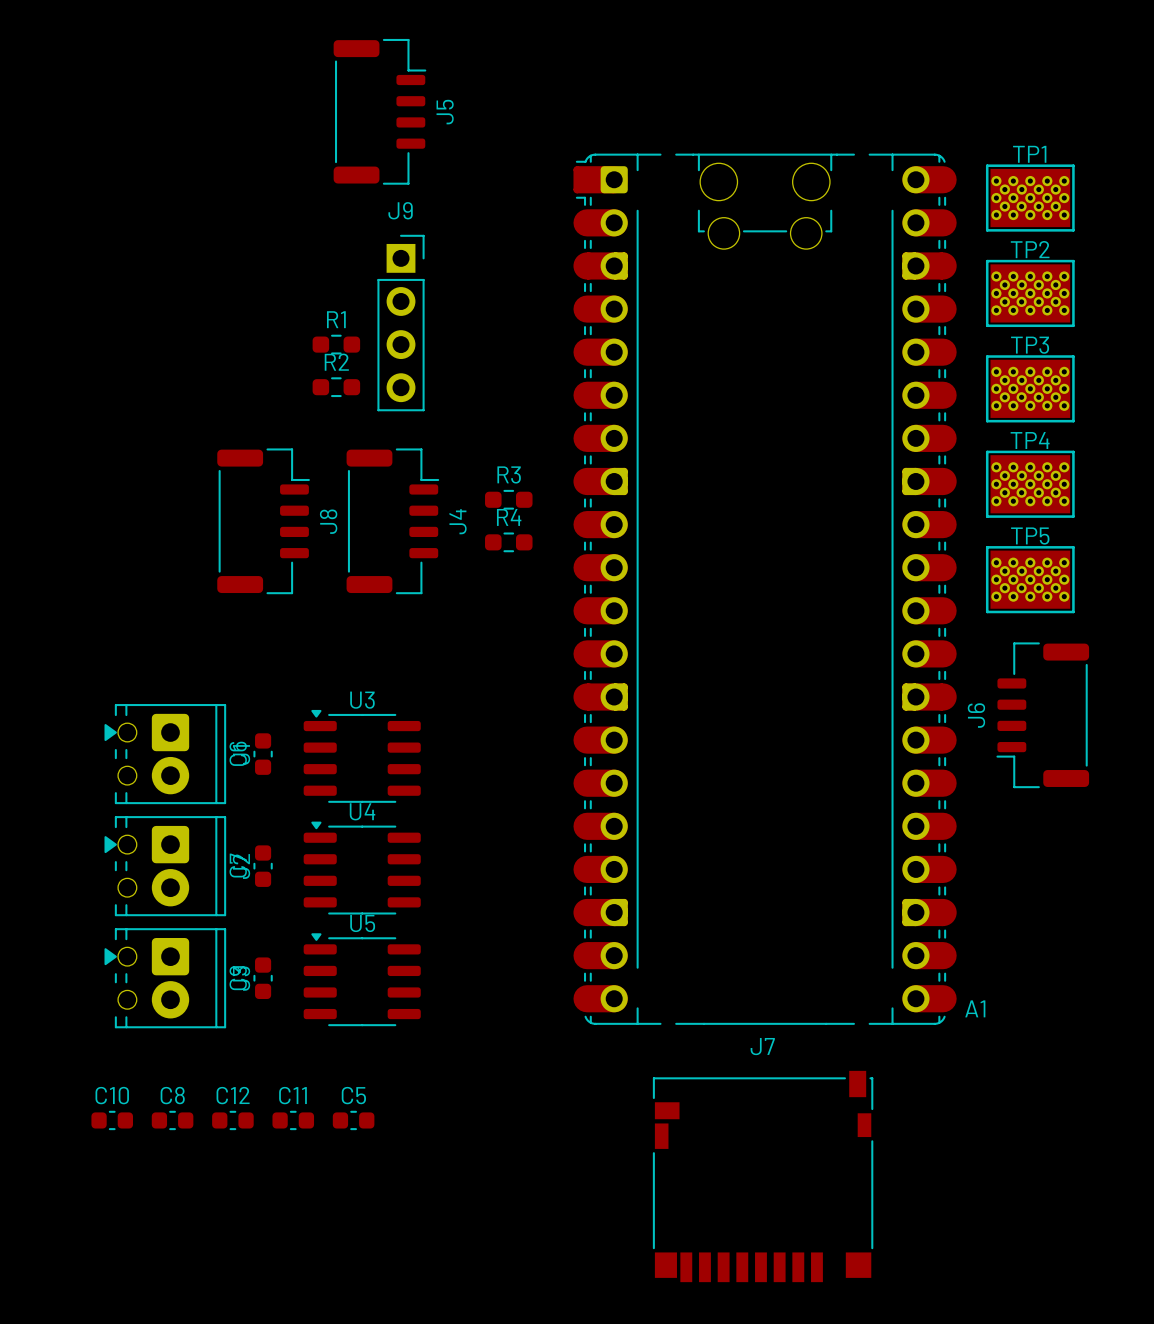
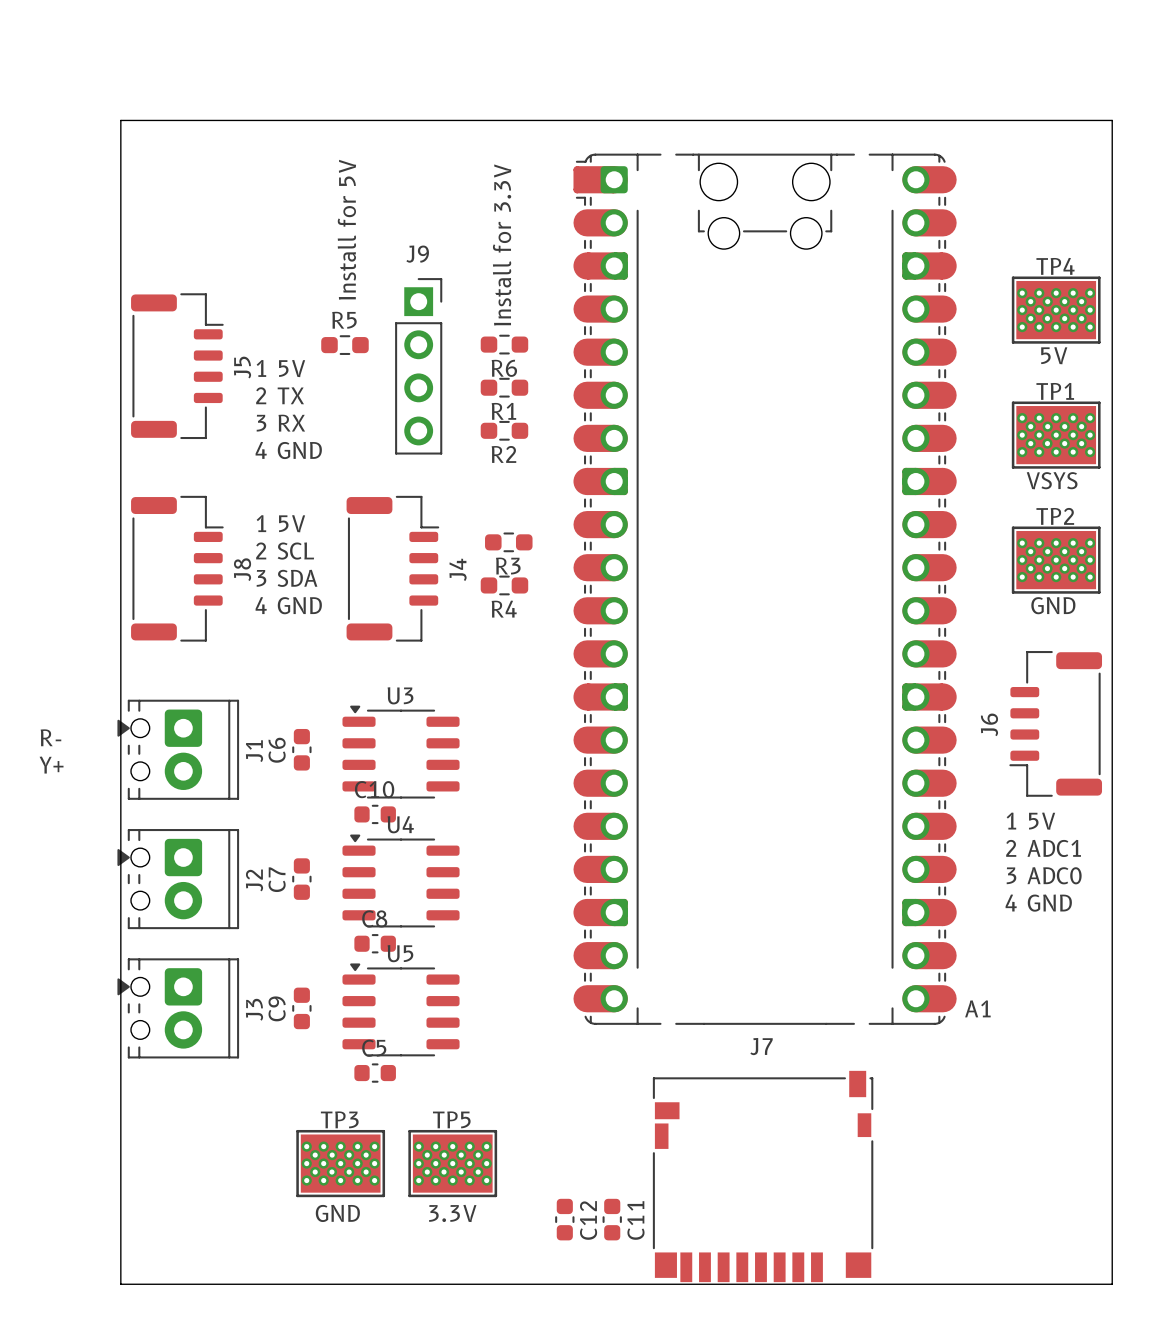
J5 position: (379, 111) -> (177, 366)
board edge: none -> (120, 120) (1112, 120) (1112, 1284) (120, 1284) (120, 120)
TP1 position: (1030, 198) -> (1056, 435)
text: none -> Install for 5V (346, 229)
text: none -> Install for 3.3V (502, 245)
TP2 position: (1030, 293) -> (1056, 560)
R1 name position: R1 (336, 319) -> R1 (503, 411)
J9 position: (401, 323) -> (418, 366)
R1 position: (336, 344) -> (504, 387)
R6: none -> (504, 344)
R5: none -> (344, 345)
text: none -> 5V (1054, 355)
R2 name position: R2 (336, 362) -> R2 (503, 454)
text: none -> 1 5V (280, 368)
R2 position: (336, 387) -> (504, 430)
TP3 position: (1030, 388) -> (340, 1163)
text: none -> 2 TX (280, 395)
text: none -> 3 RX (280, 423)
text: none -> 4 GND (288, 450)
text: none -> VSYS (1052, 480)
TP4 position: (1030, 484) -> (1056, 310)
R3: (508, 499) -> none
R4 name: R4 (509, 517) -> R3 (508, 566)
J8 position: (263, 521) -> (177, 568)
J4 position: (392, 521) -> (392, 568)
text: none -> 1 5V (280, 523)
text: none -> 2 SCL (285, 551)
text: none -> 3 SDA (287, 578)
TP5 position: (1030, 579) -> (452, 1163)
R4: none -> (504, 585)
text: none -> 4 GND (288, 605)
text: none -> GND (1053, 605)
J6 position: (1042, 715) -> (1055, 723)
text: none -> R- (50, 737)
J1 position: (165, 754) -> (178, 749)
C6 position: (263, 754) -> (301, 749)
U3 position: (362, 756) -> (401, 752)
text: none -> Y+ (51, 765)
text: none -> 1 5V (1030, 821)
text: none -> 2 ADC1 (1043, 848)
J2 position: (165, 866) -> (178, 879)
C7 position: (263, 866) -> (301, 879)
U4 position: (362, 868) -> (401, 880)
text: none -> 3 ADC0 (1044, 875)
text: none -> 4 GND (1038, 903)
J3 position: (165, 978) -> (178, 1008)
C9 position: (263, 978) -> (301, 1008)
U5 position: (362, 979) -> (401, 1009)
C10 position: (112, 1120) -> (375, 814)
C8 position: (172, 1120) -> (375, 943)
C12 rotation: 0° (232, 1120) -> 90° clockwise (564, 1219)
C12 position: (232, 1120) -> (564, 1219)
C11 rotation: 0° (293, 1120) -> 90° clockwise (612, 1219)
C11 position: (293, 1120) -> (612, 1219)
C5 position: (353, 1120) -> (375, 1073)
text: none -> GND (337, 1213)
text: none -> 3.3V (452, 1213)

